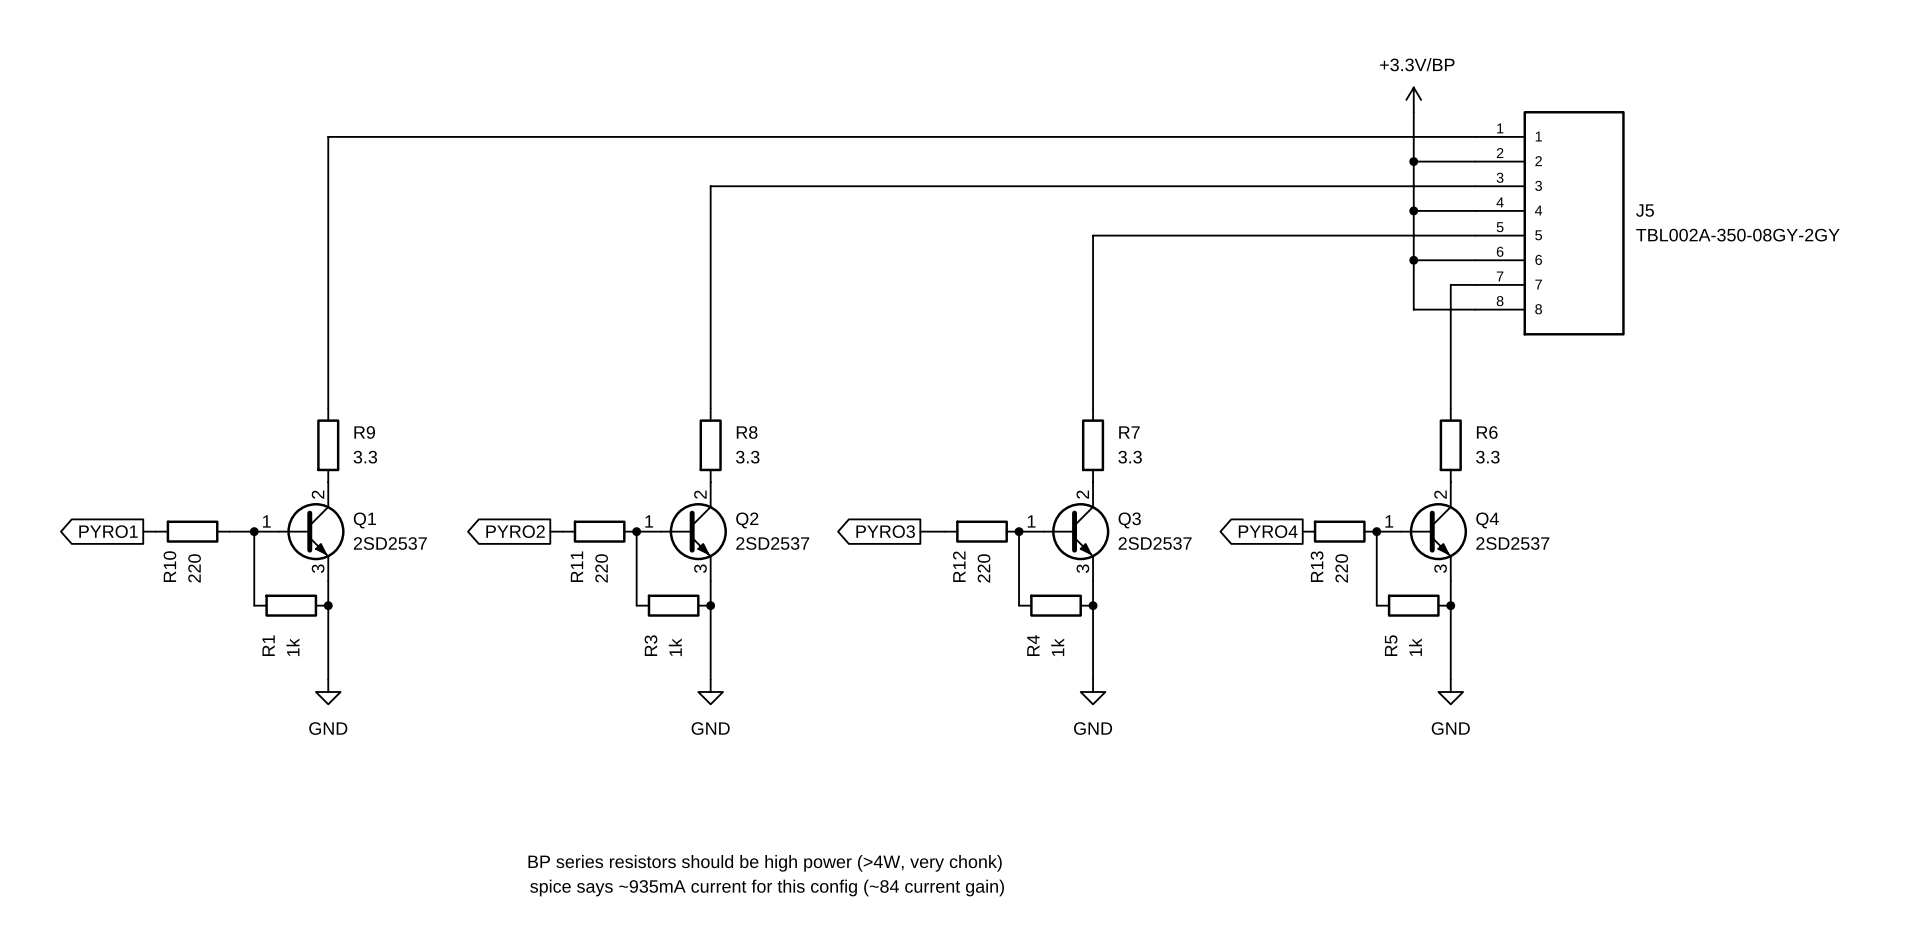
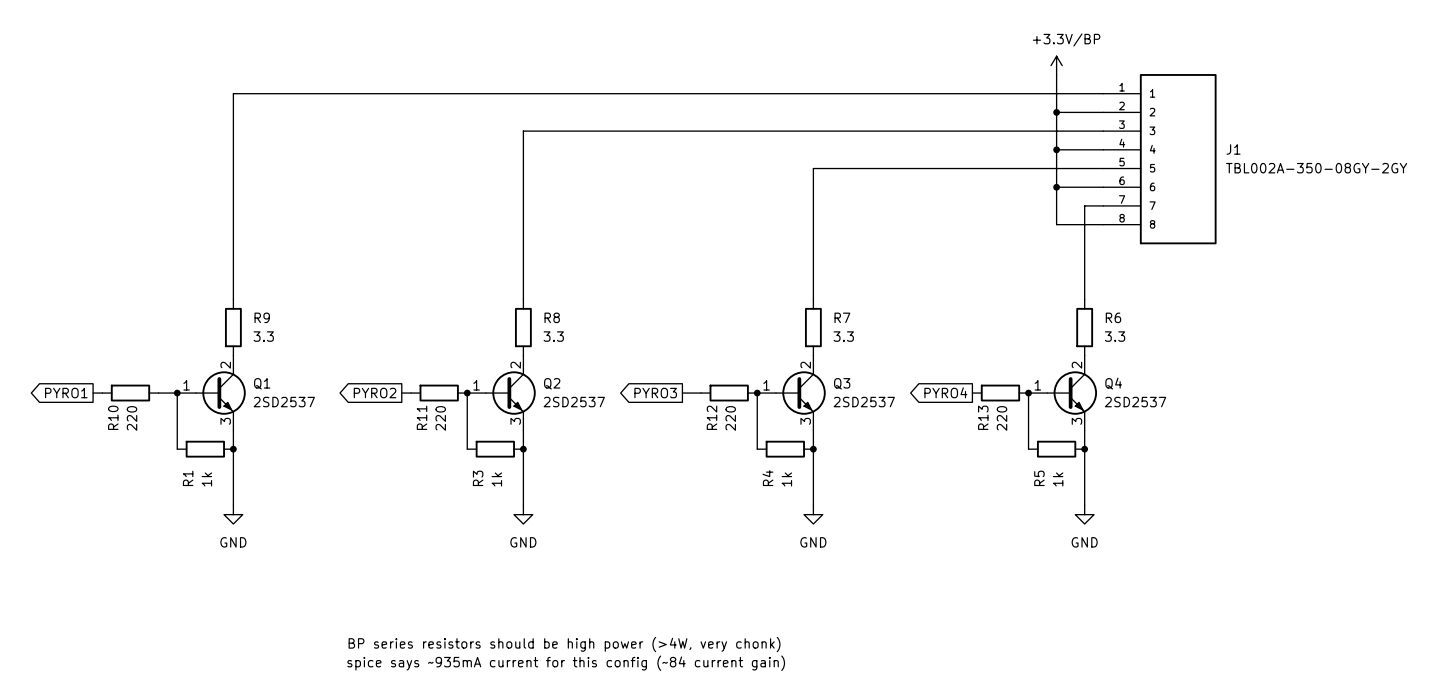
J5 name: J5 (1645, 210) -> J1 (1233, 149)

